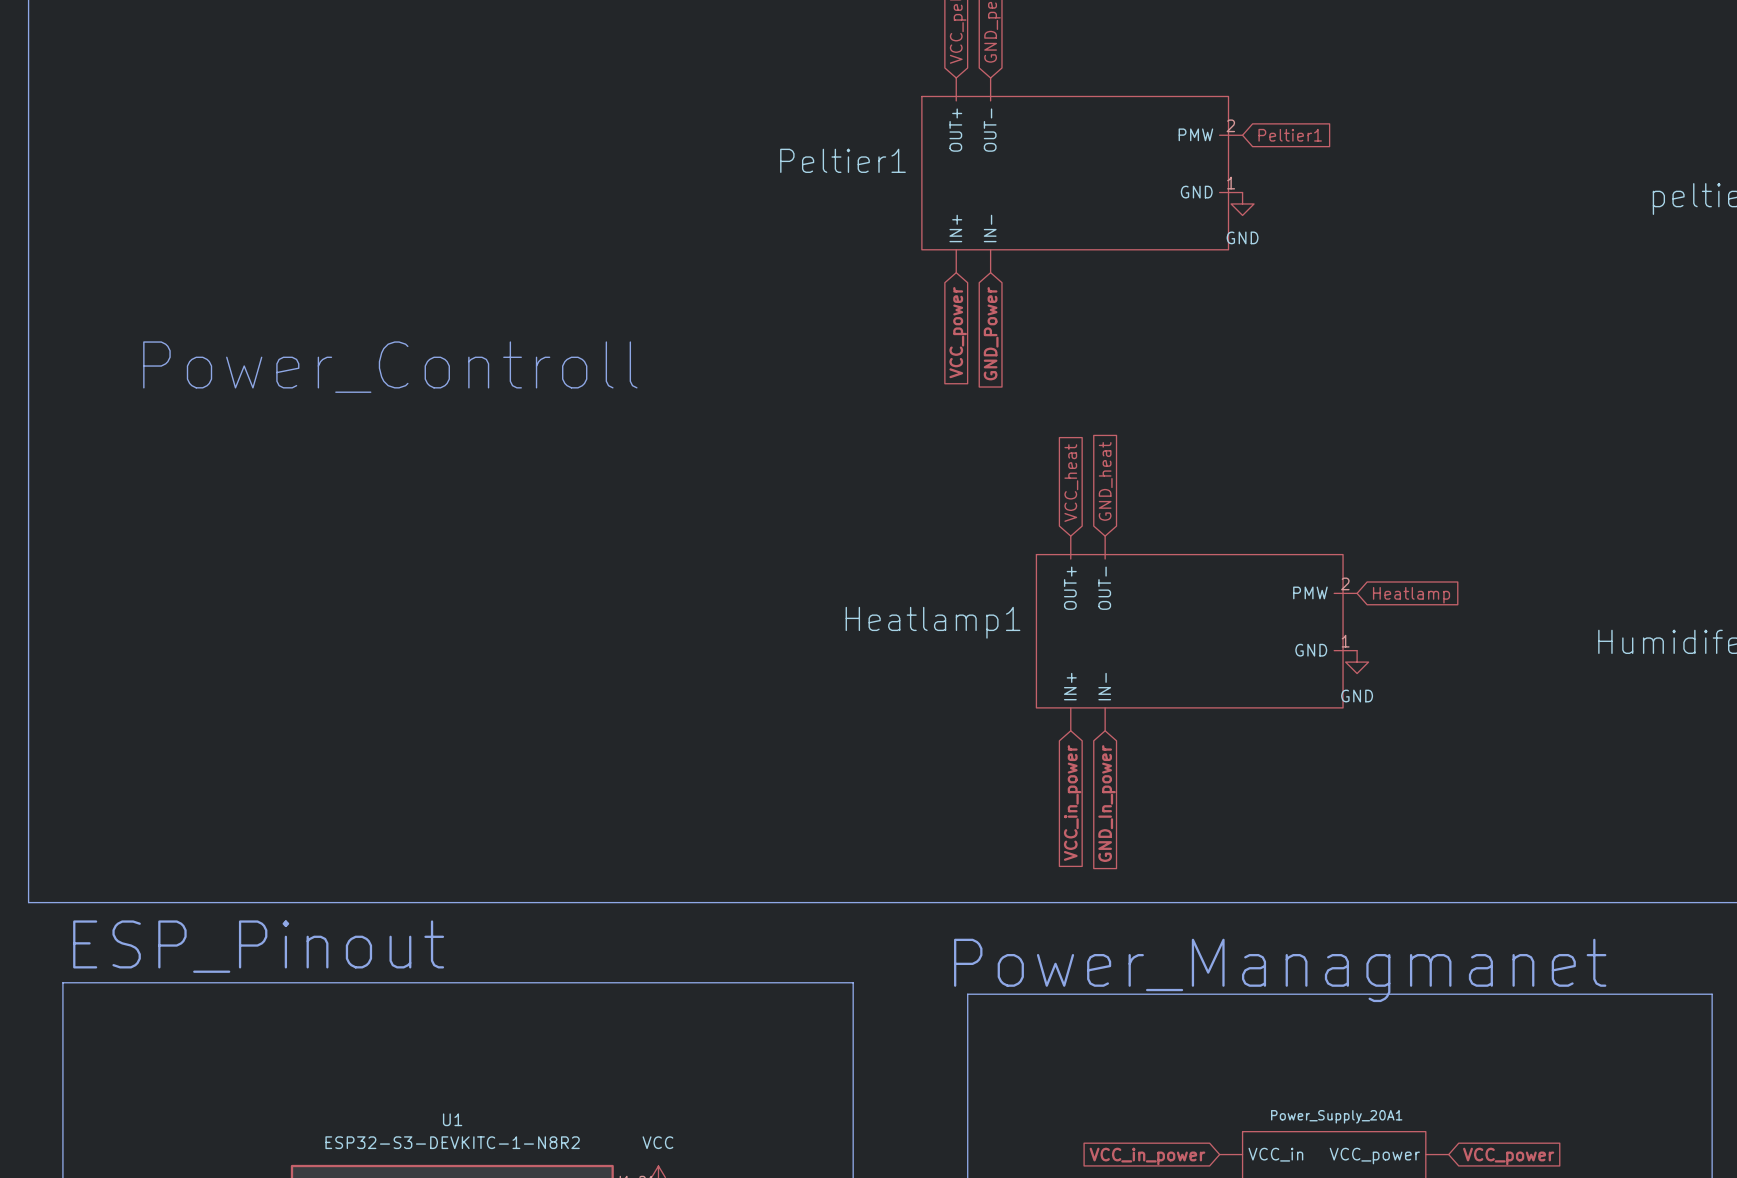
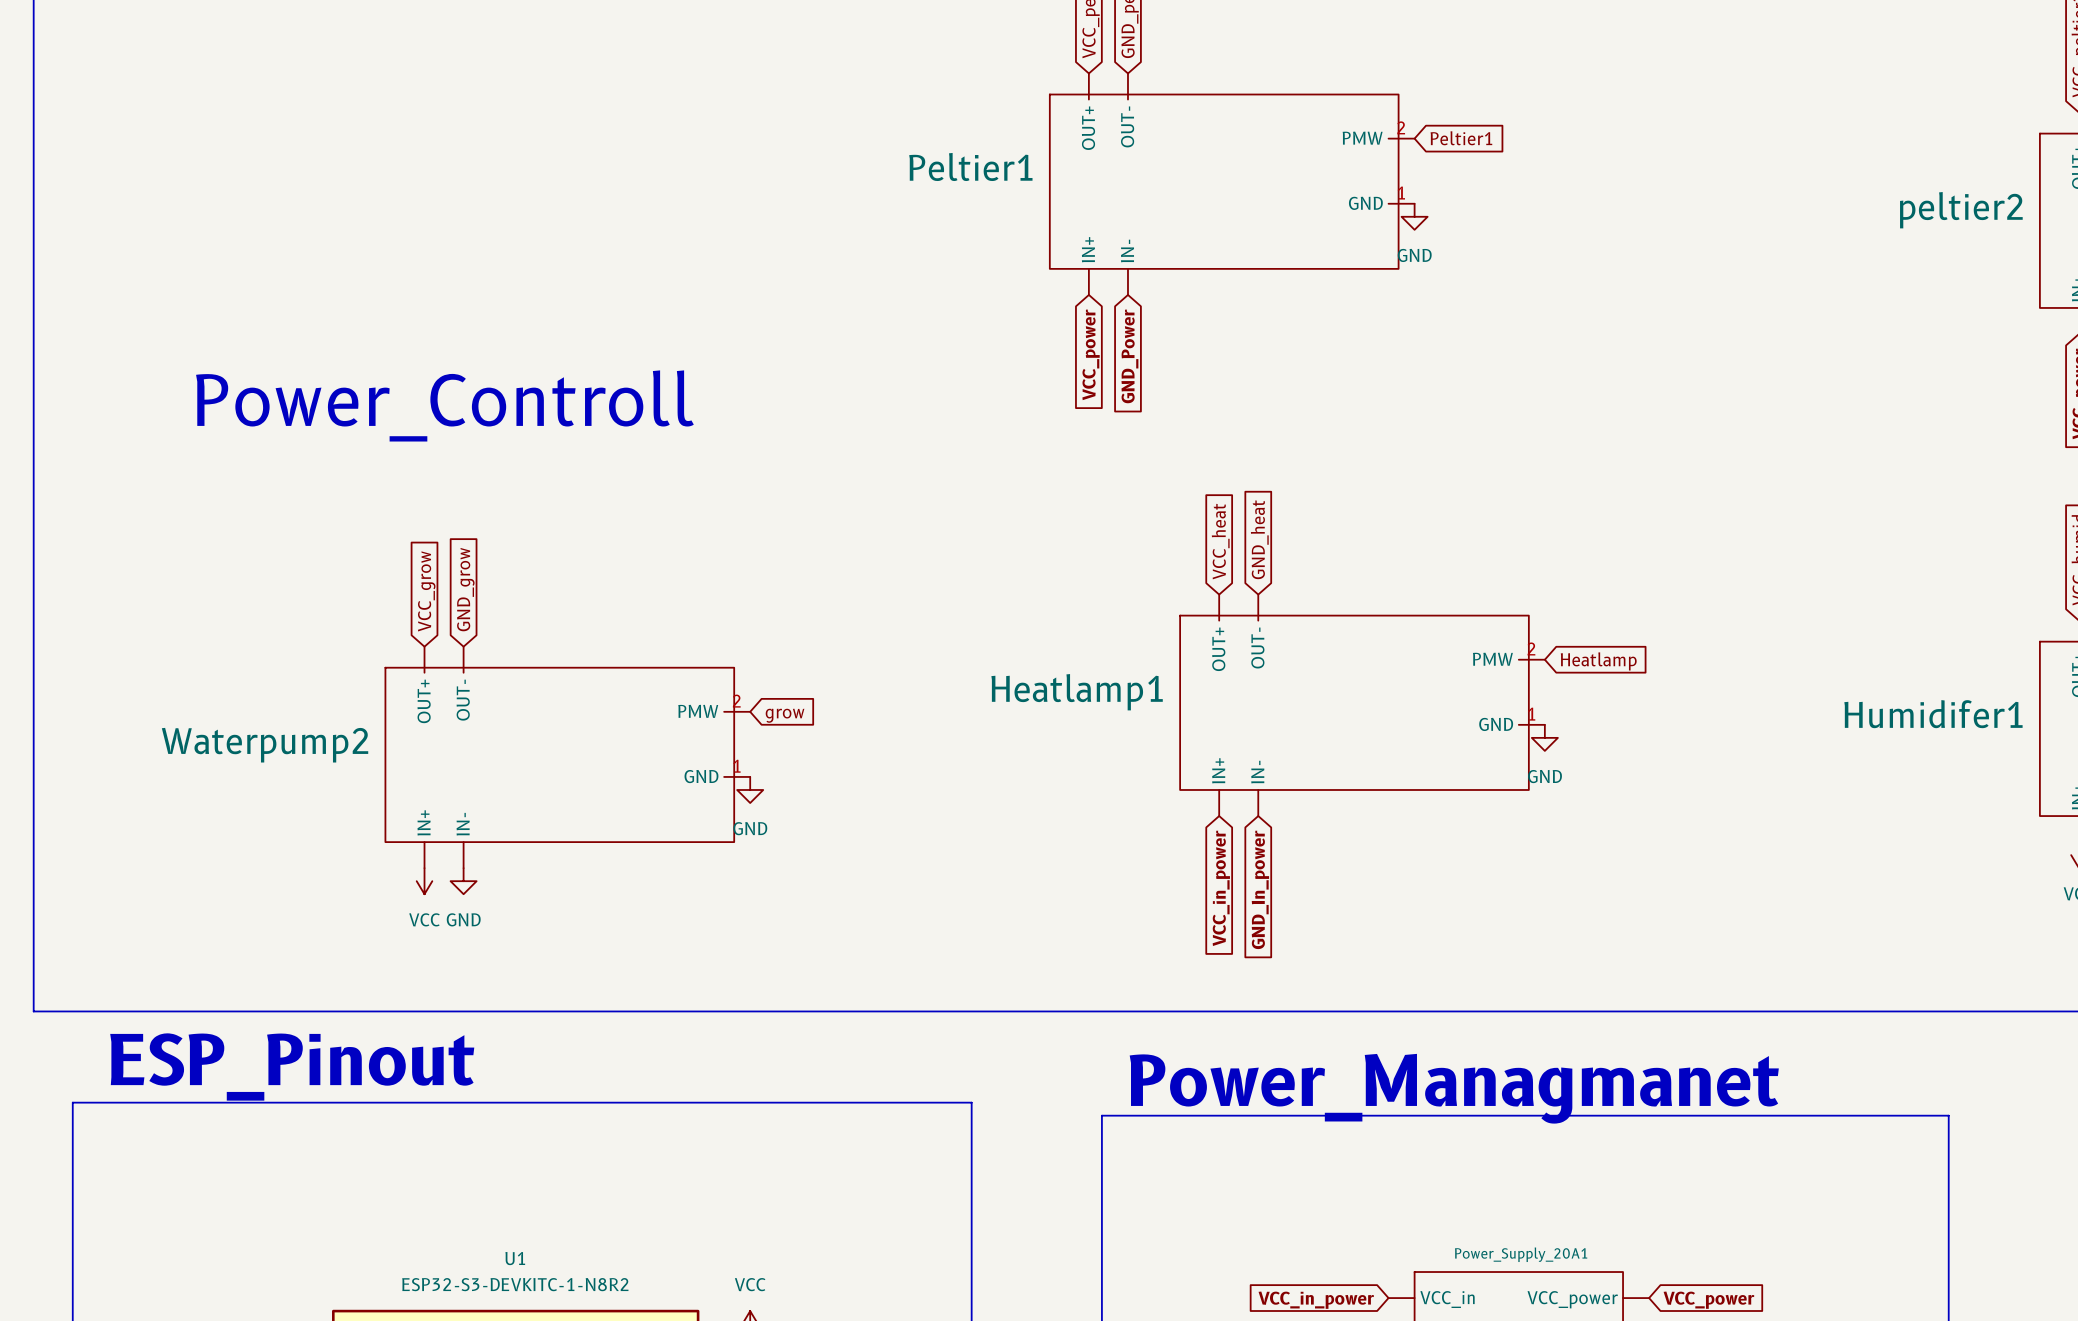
global label: none -> GND_grow (465, 589)
global label: none -> VCC_grow (426, 591)
global label: none -> grow (785, 715)
Waterpump2: none -> (567, 757)
power symbol: none -> GND (750, 789)
power symbol: none -> VCC (424, 881)
power symbol: none -> GND (463, 881)

